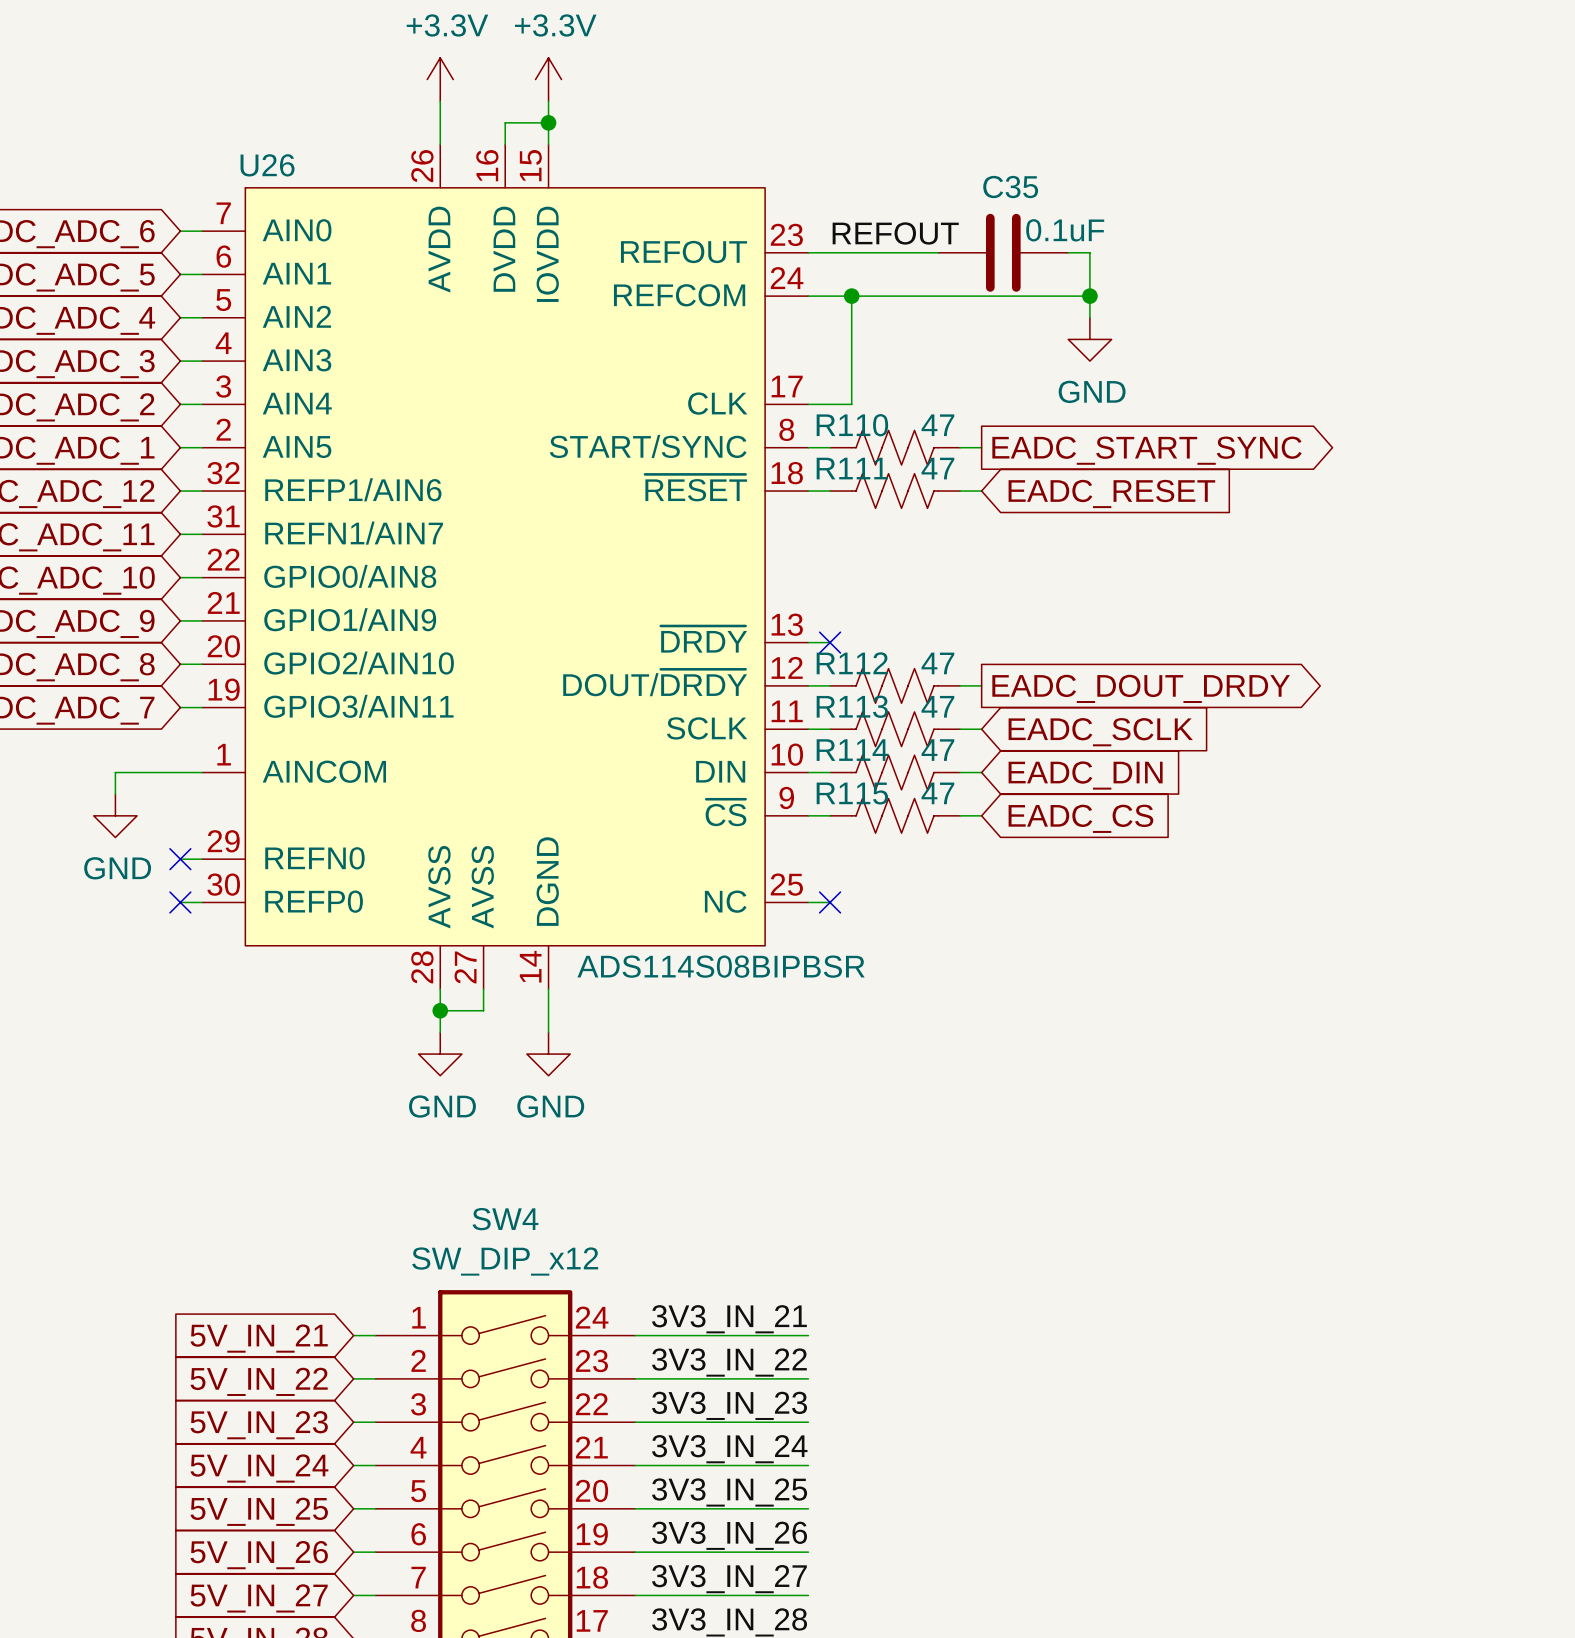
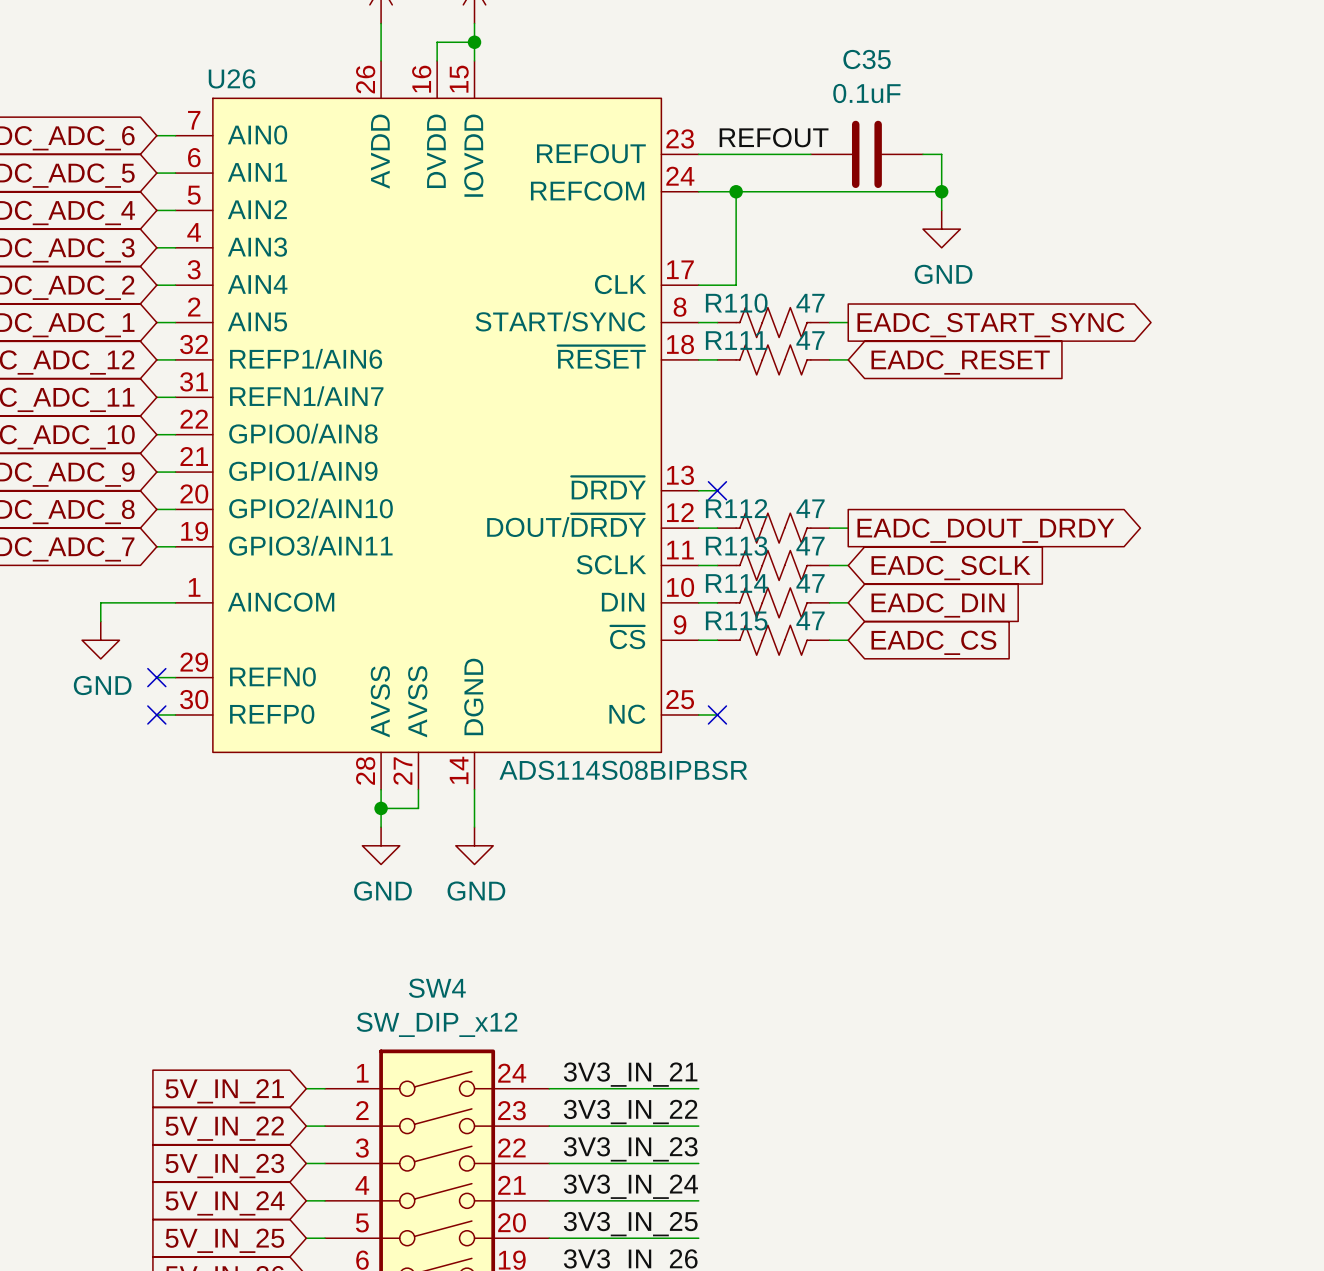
C35 name position: C35 (1010, 187) -> C35 (867, 59)
C35 value position: 0.1uF (1065, 230) -> 0.1uF (866, 93)

